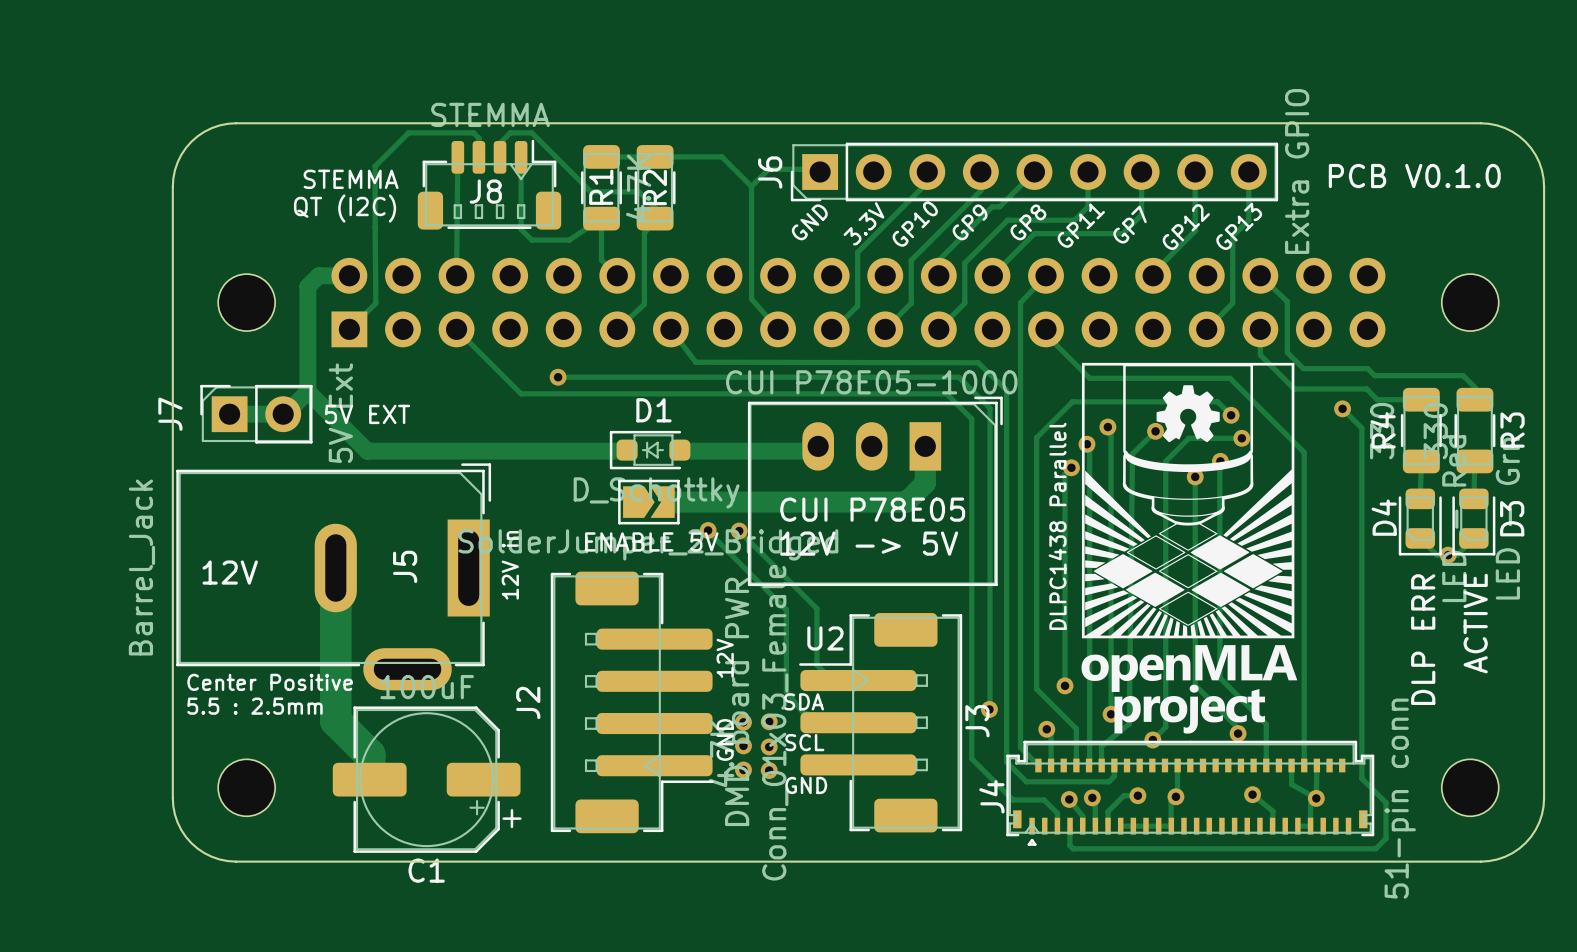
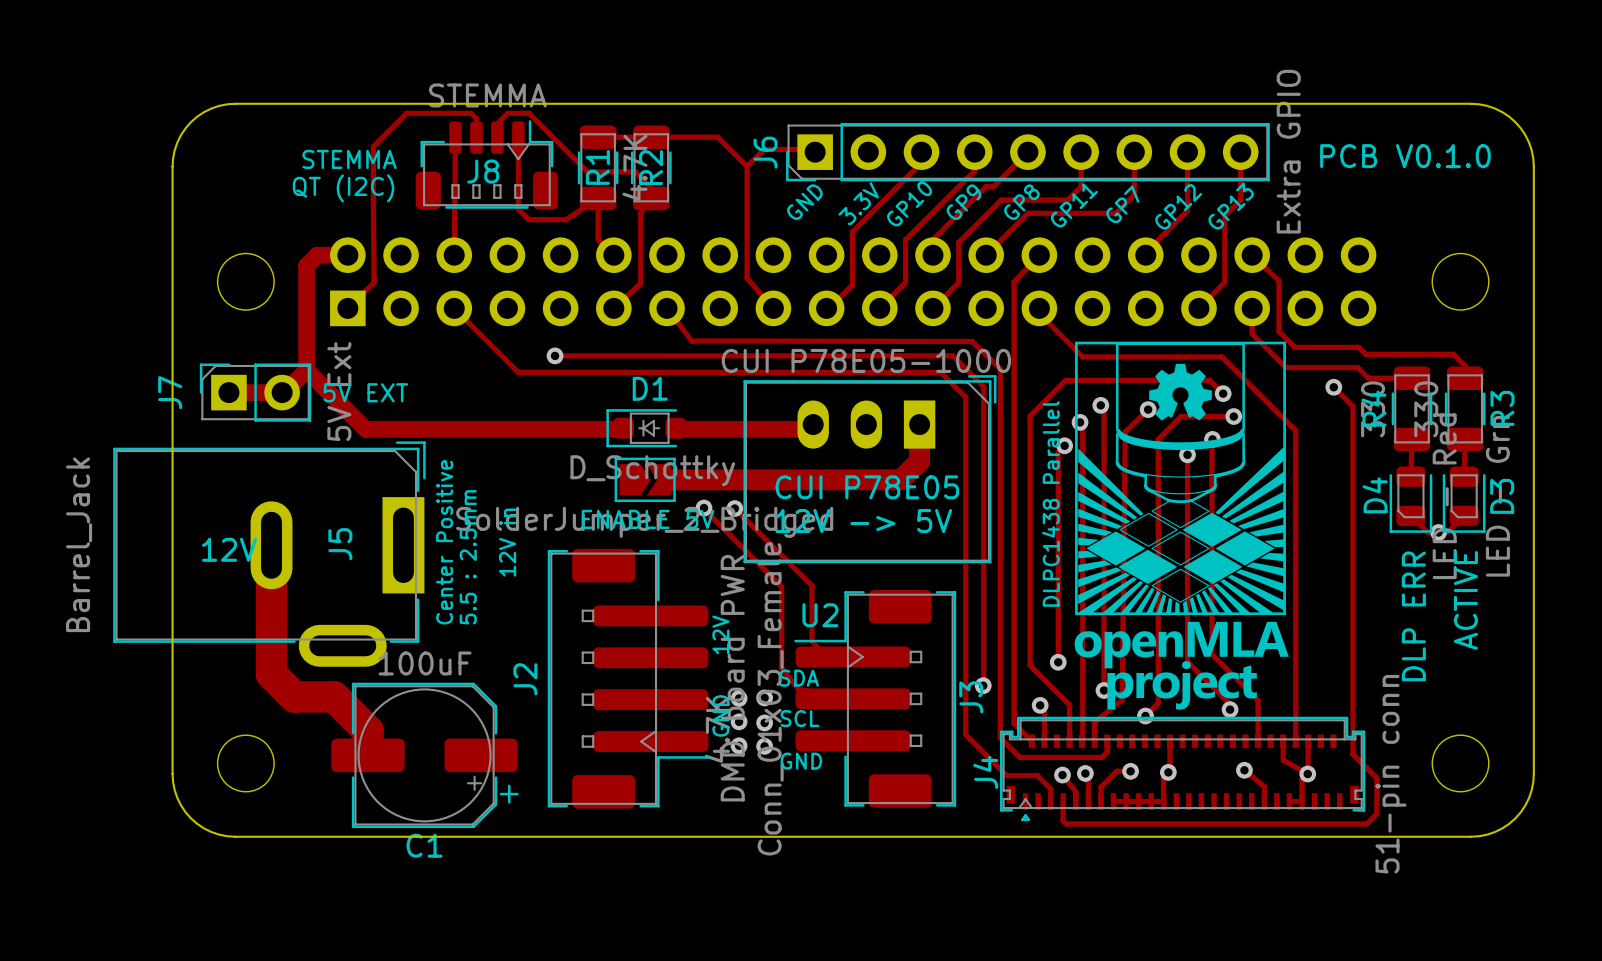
track: (335, 568) (335, 720) -> (271, 545) (271, 674) (294, 696) (334, 696)
J5 position: (333, 576) -> (269, 554)
text rotation: 0° (270, 682) -> 90° counterclockwise (444, 542)
text rotation: 0° (255, 706) -> 90° counterclockwise (468, 557)
text position: 5.5 : 2.5mm (255, 706) -> 5.5 : 2.5mm (468, 557)

